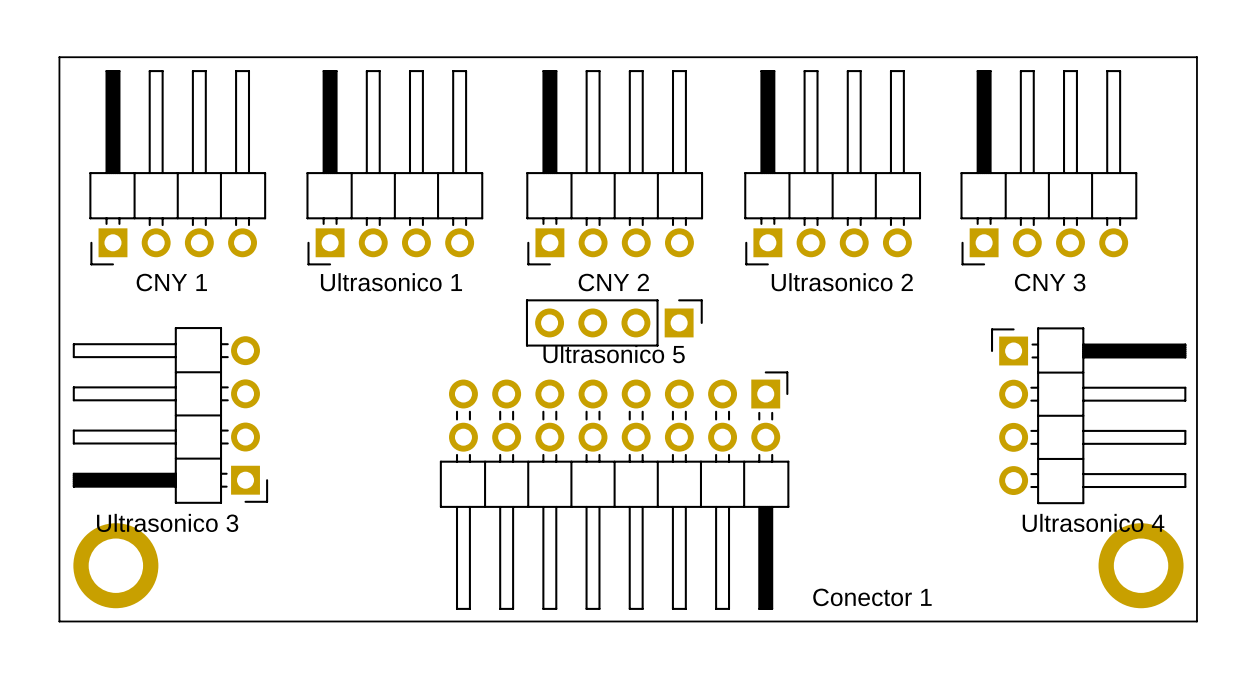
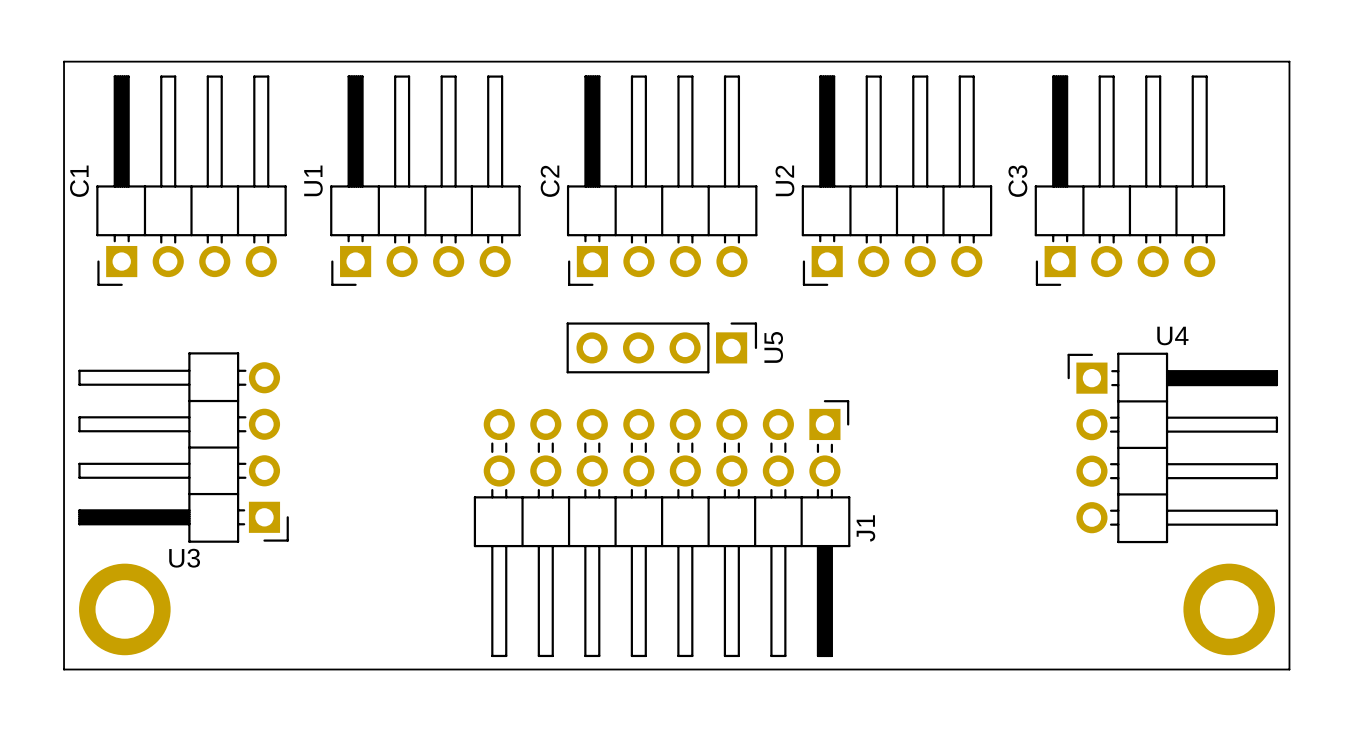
CNY 1 name: CNY 1 (171, 282) -> C1 (79, 181)
Ultrasonico 1 name: Ultrasonico 1 (391, 282) -> U1 (313, 180)
CNY 2 name: CNY 2 (613, 282) -> C2 (550, 181)
Ultrasonico 2 name: Ultrasonico 2 (842, 282) -> U2 (784, 180)
CNY 3 name: CNY 3 (1050, 282) -> C3 (1017, 181)
Ultrasonico 5 name: Ultrasonico 5 (614, 354) -> U5 (773, 347)
Ultrasonico 3 name: Ultrasonico 3 (167, 522) -> U3 (184, 558)
Ultrasonico 4 name: Ultrasonico 4 (1093, 522) -> U4 (1172, 335)
Conector 1 name: Conector 1 (872, 597) -> J1 (865, 528)

